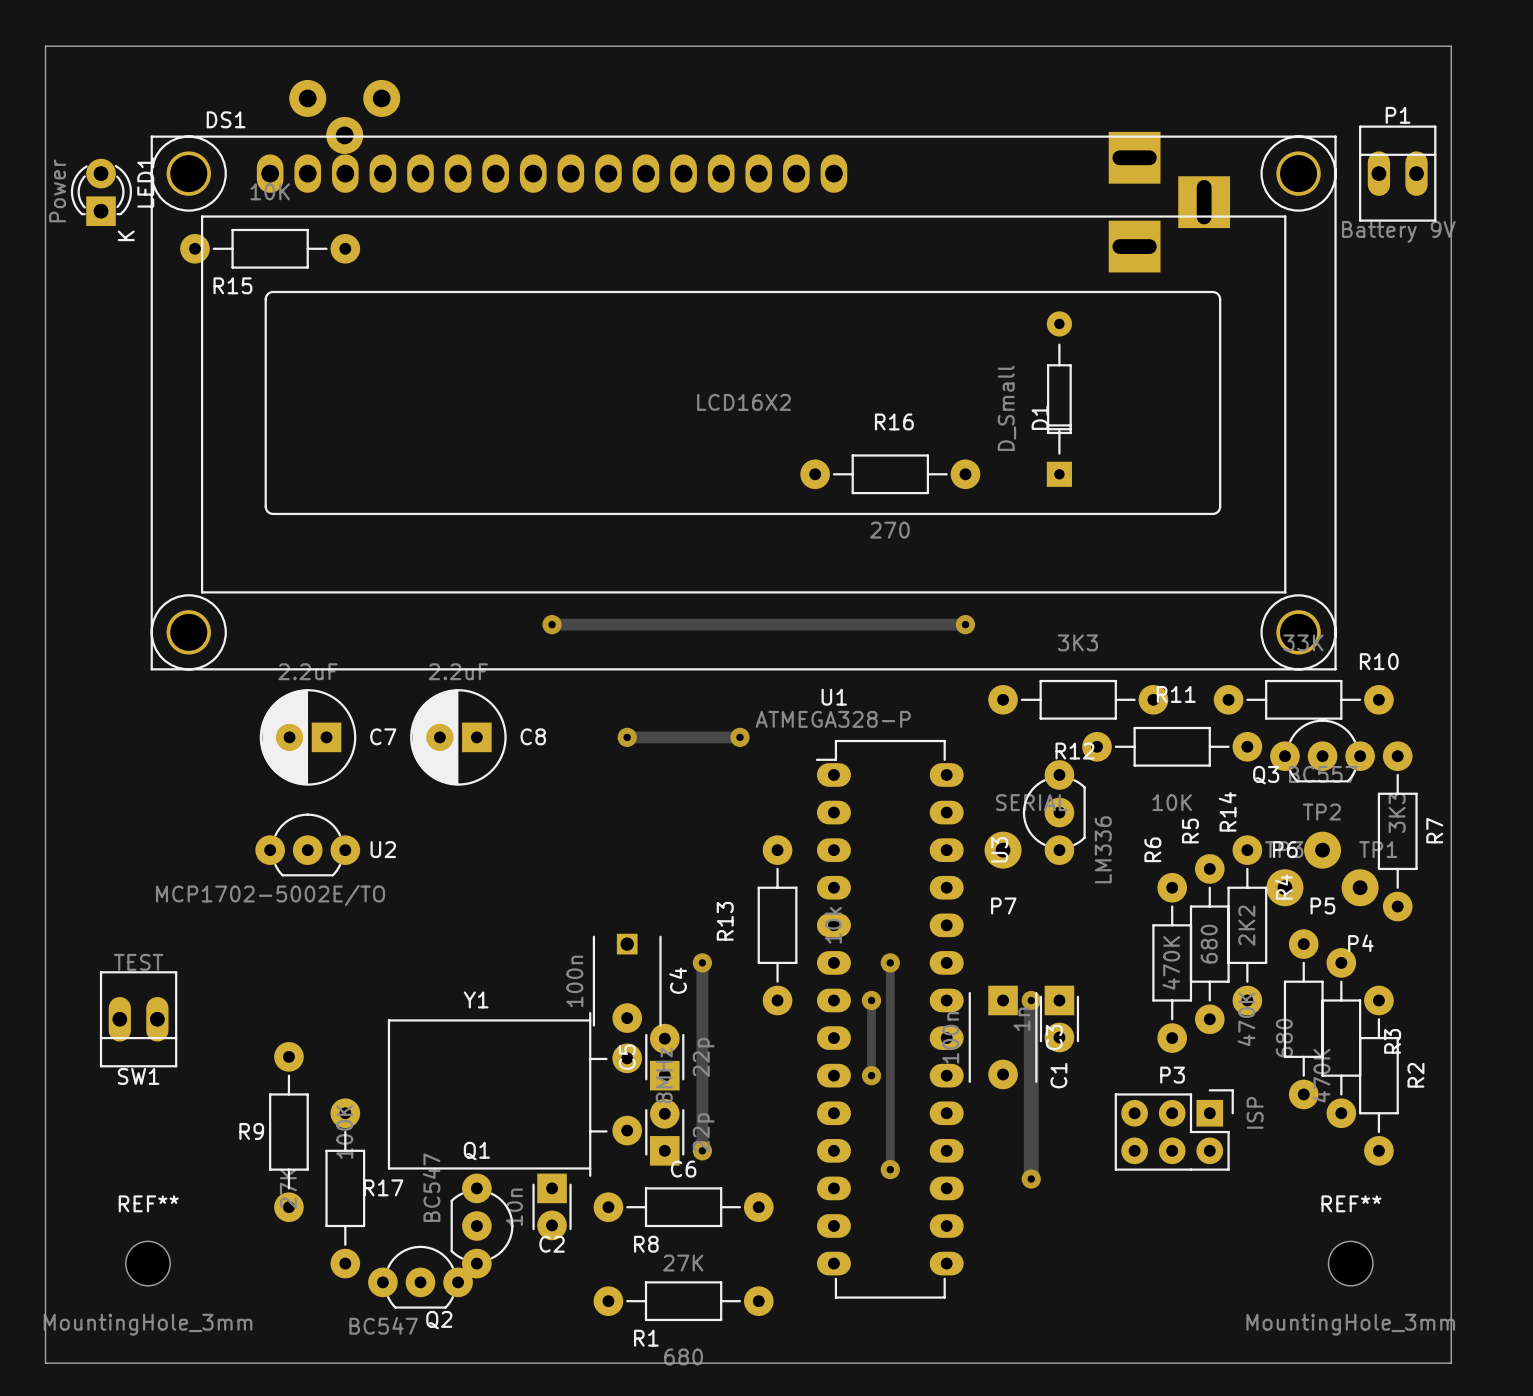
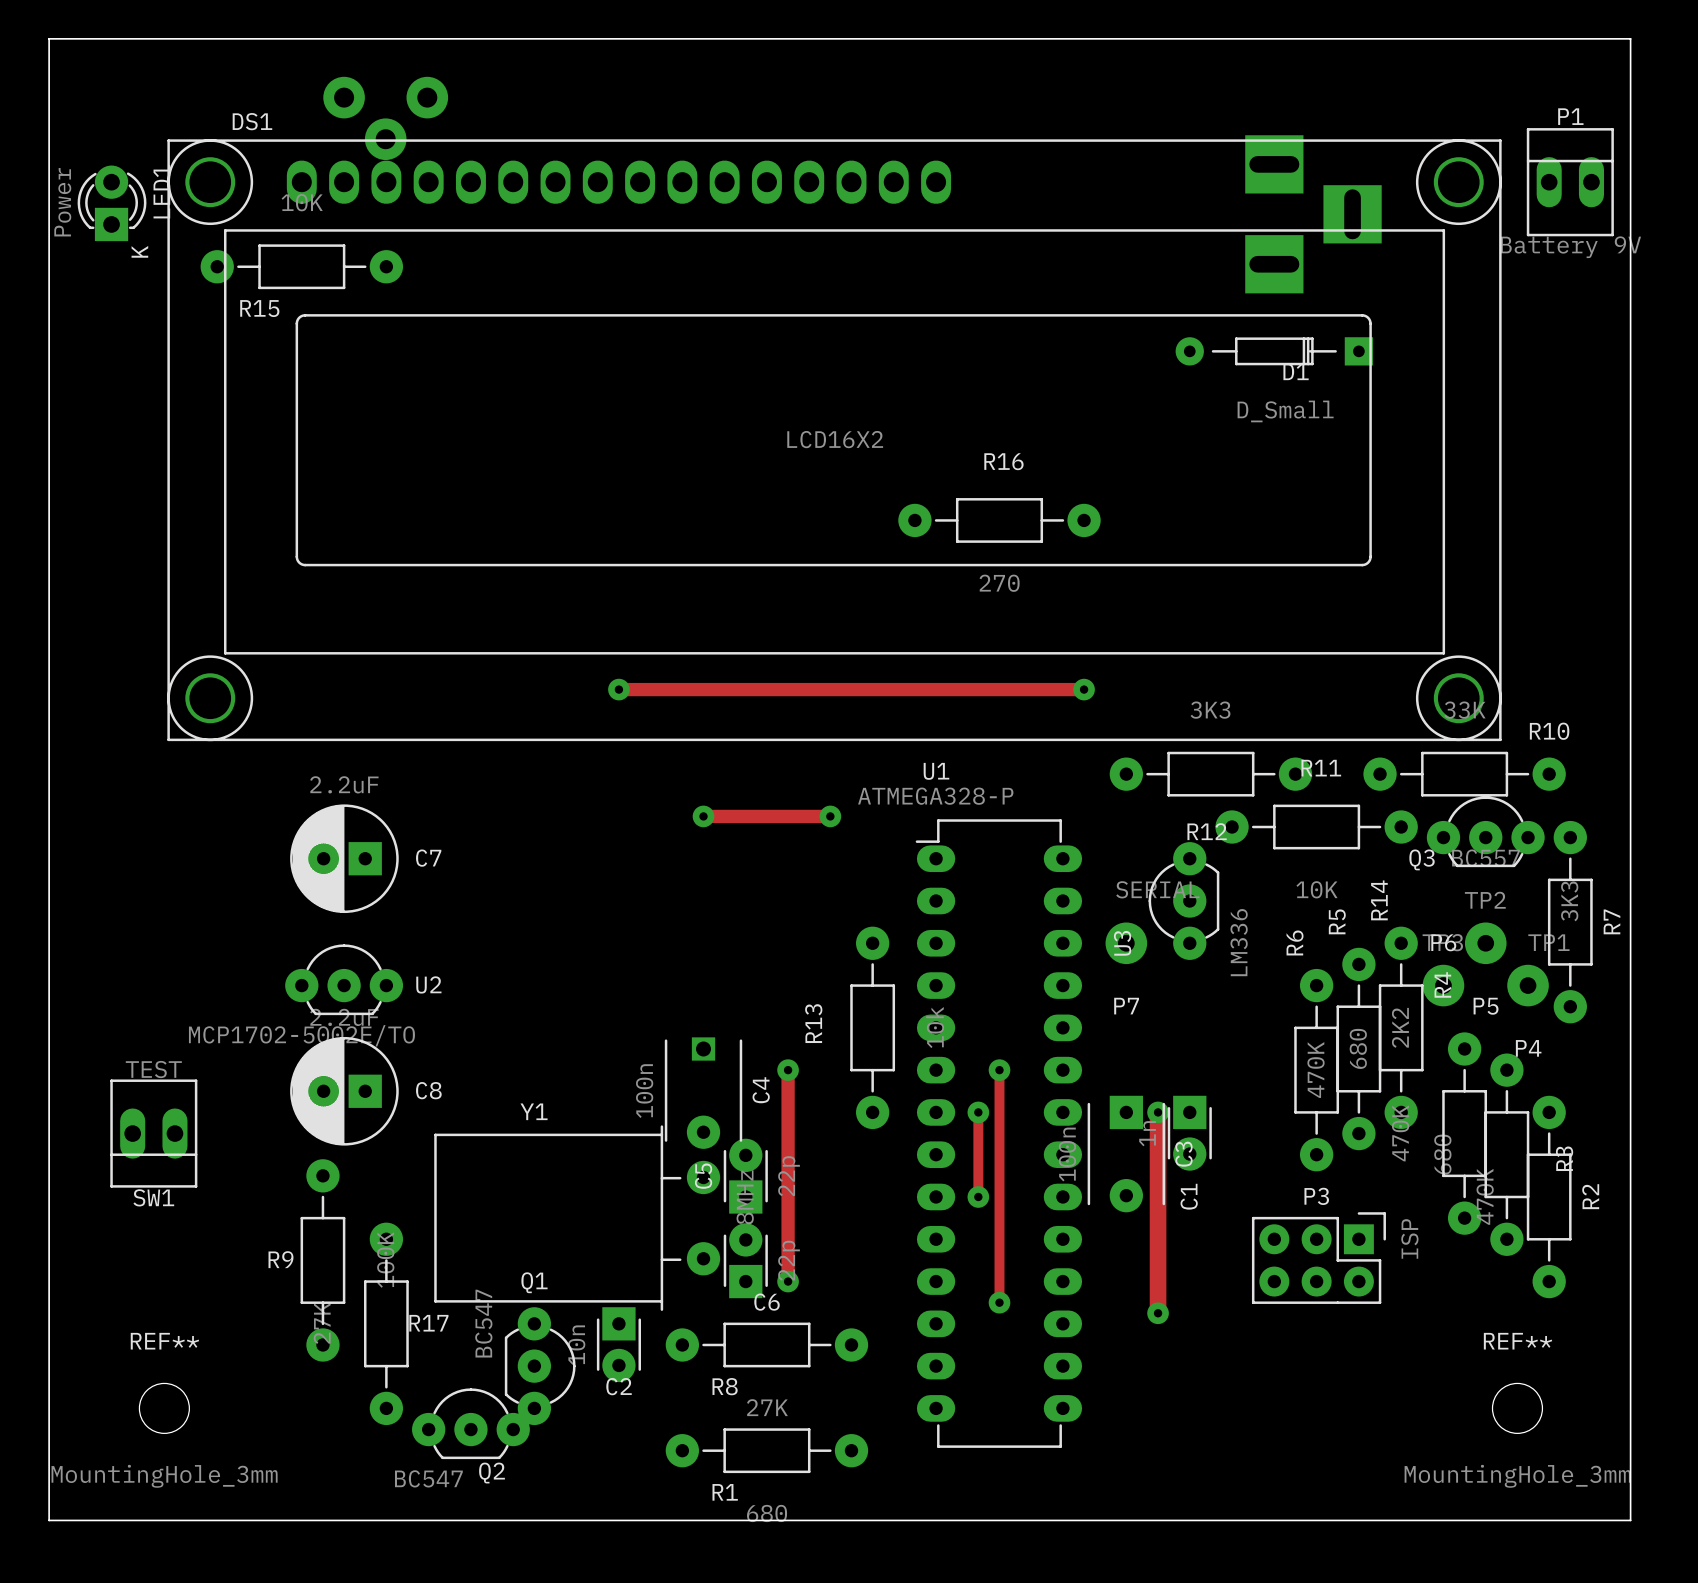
D1 rotation: 0° (1059, 399) -> 90° counterclockwise (1274, 351)
D1 position: (1059, 399) -> (1274, 351)
C7 position: (308, 737) -> (344, 858)
C8 position: (458, 737) -> (344, 1091)
U2 position: (307, 844) -> (344, 979)

